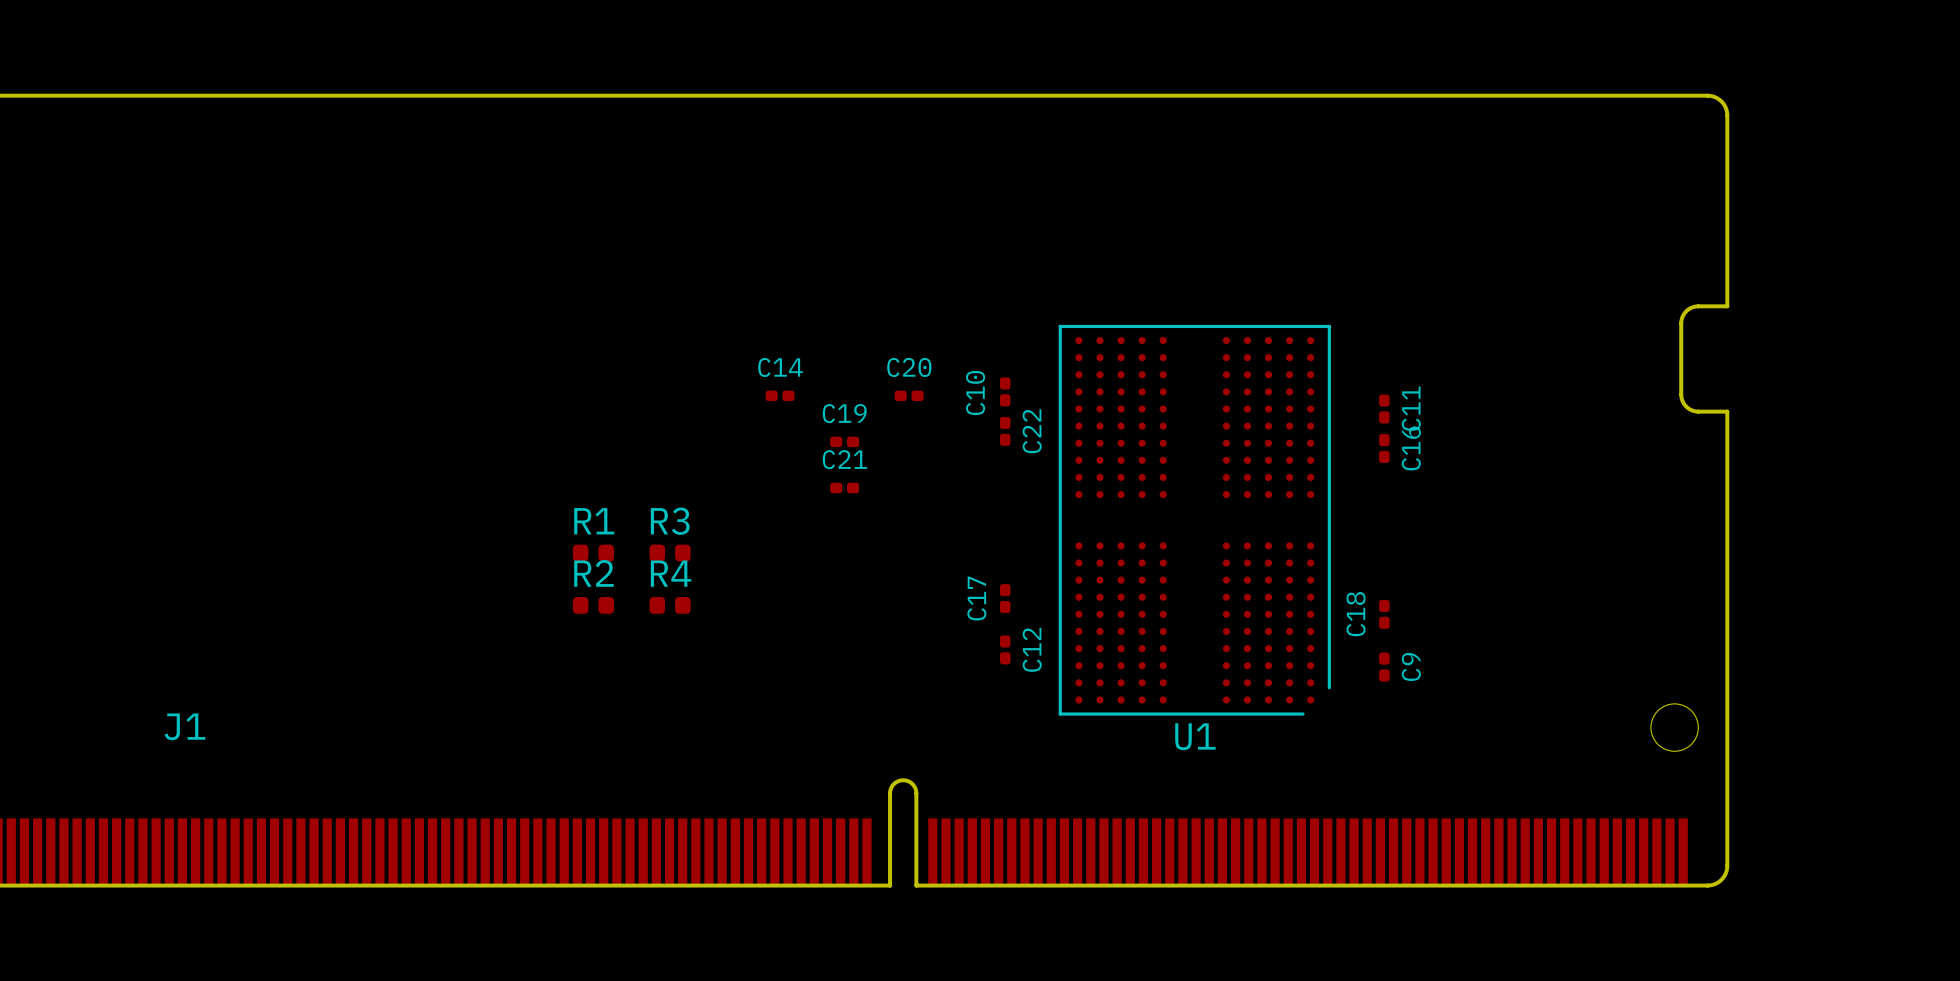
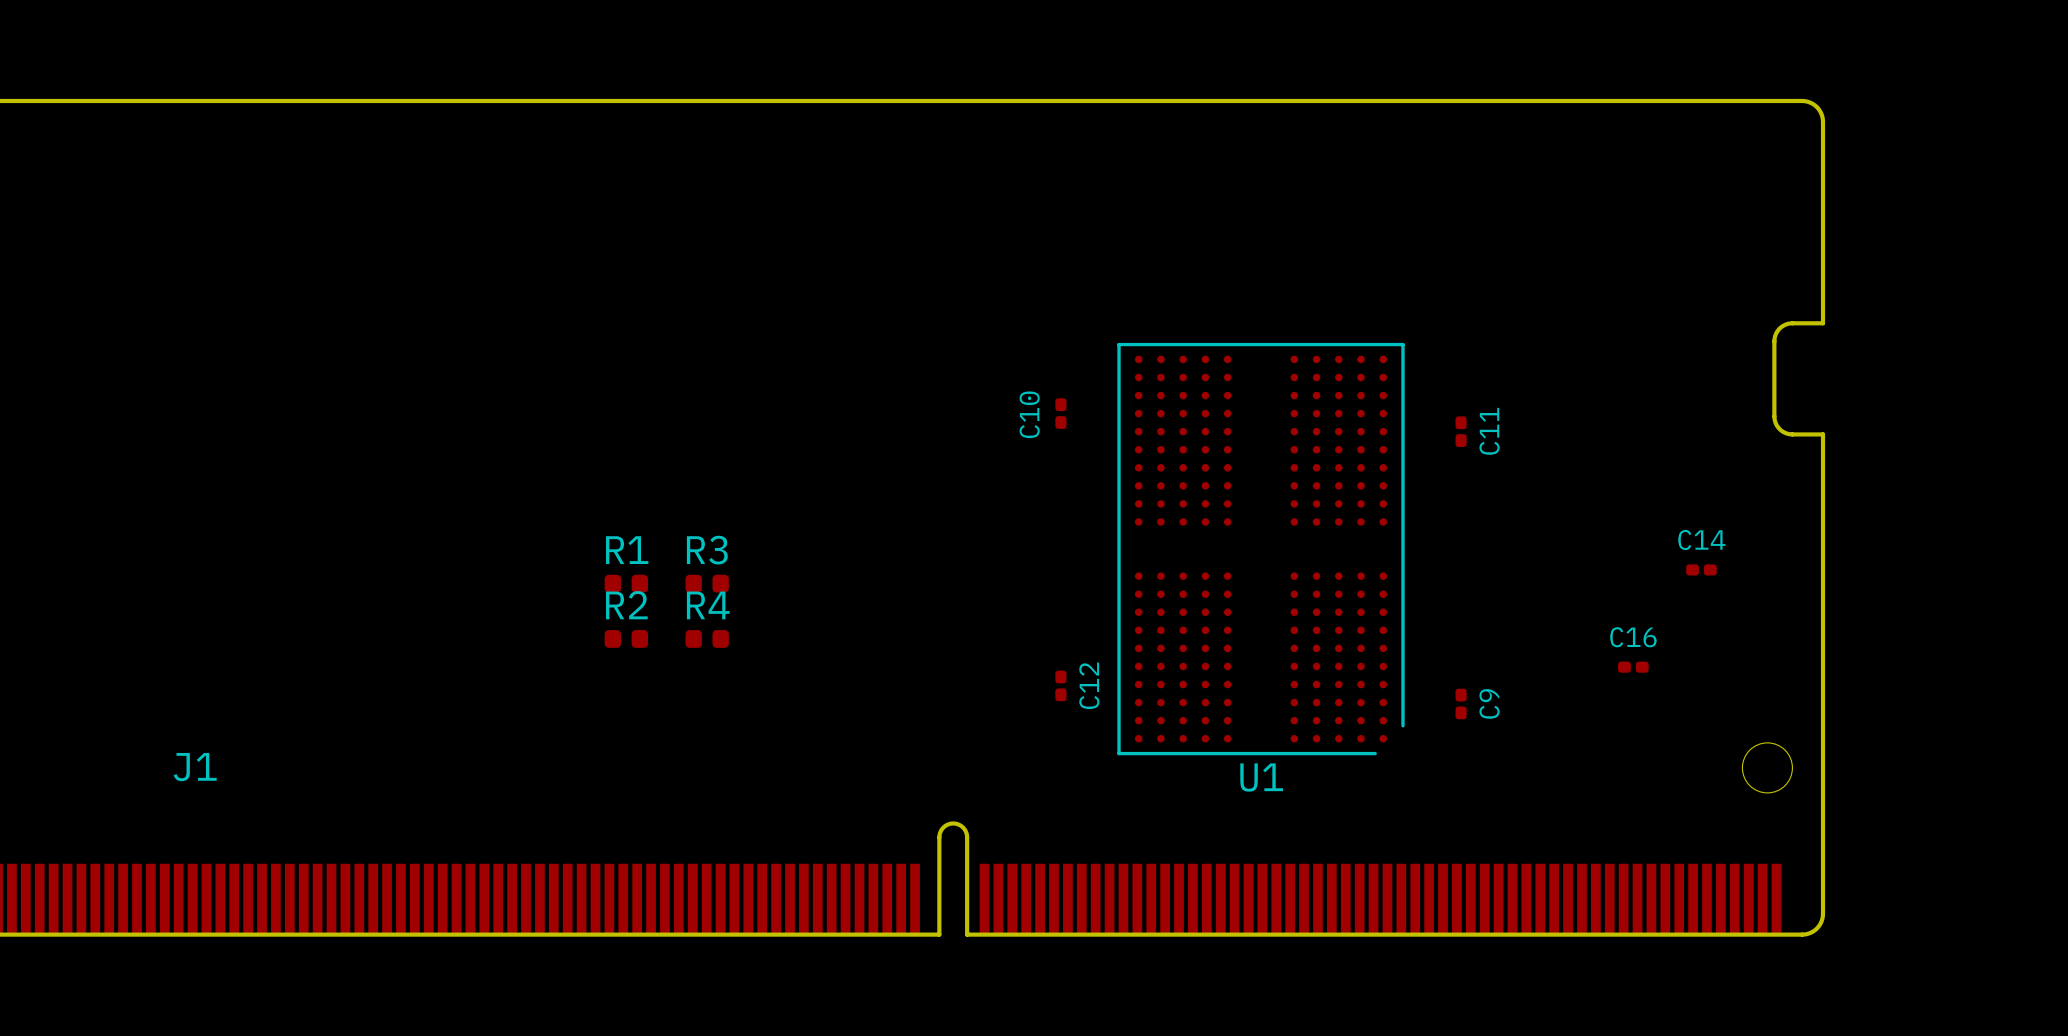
C14 position: (780, 395) -> (1701, 569)
C20: (909, 395) -> none
C22: (1005, 431) -> none
C19: (844, 441) -> none
C16 rotation: 0° (1384, 448) -> 90° clockwise (1633, 667)
C16 position: (1384, 448) -> (1633, 667)
C21: (844, 487) -> none
C17: (1005, 598) -> none
C18: (1384, 614) -> none

